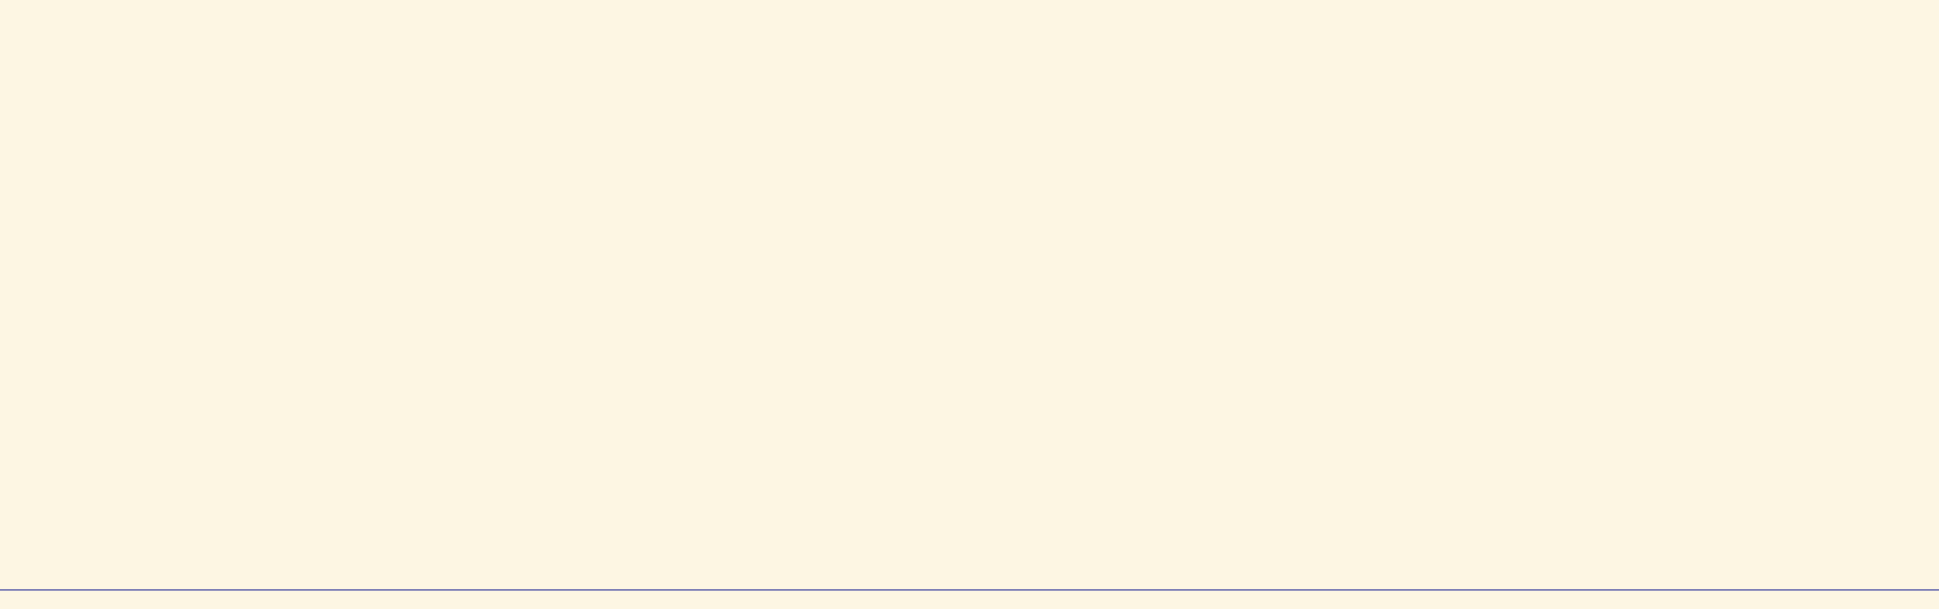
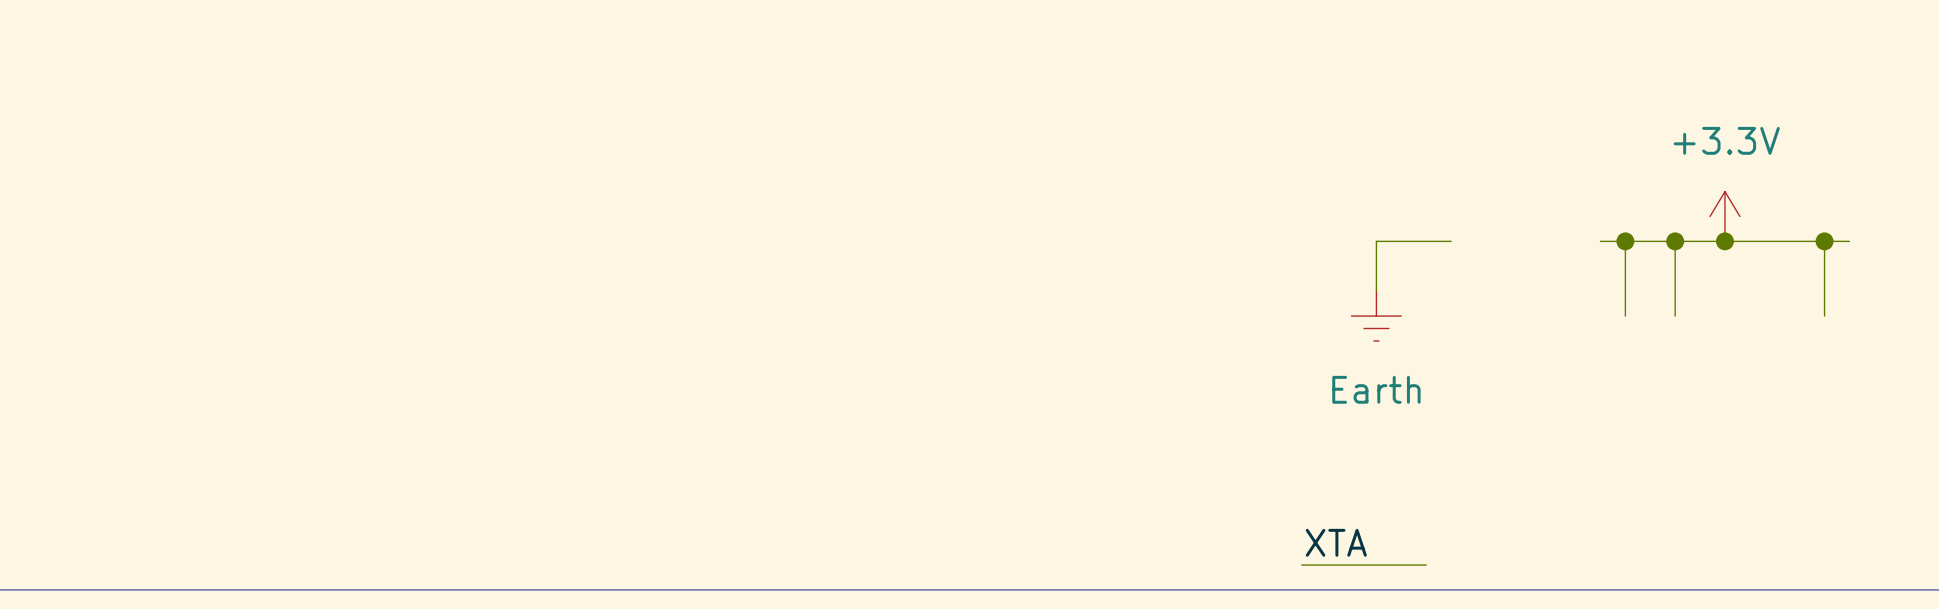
power symbol: none -> +3.3V (1724, 216)
wire: none -> (1451, 241) (1376, 241) (1376, 291)
wire: none -> (1600, 241) (1849, 241)
wire: none -> (1625, 241) (1625, 316)
junction: none -> (1625, 241)
wire: none -> (1675, 241) (1675, 316)
junction: none -> (1675, 241)
junction: none -> (1724, 241)
wire: none -> (1824, 241) (1824, 316)
junction: none -> (1824, 241)
power symbol: none -> Earth (1376, 316)
label: none -> XTA (1336, 542)
wire: none -> (1301, 565) (1426, 565)

